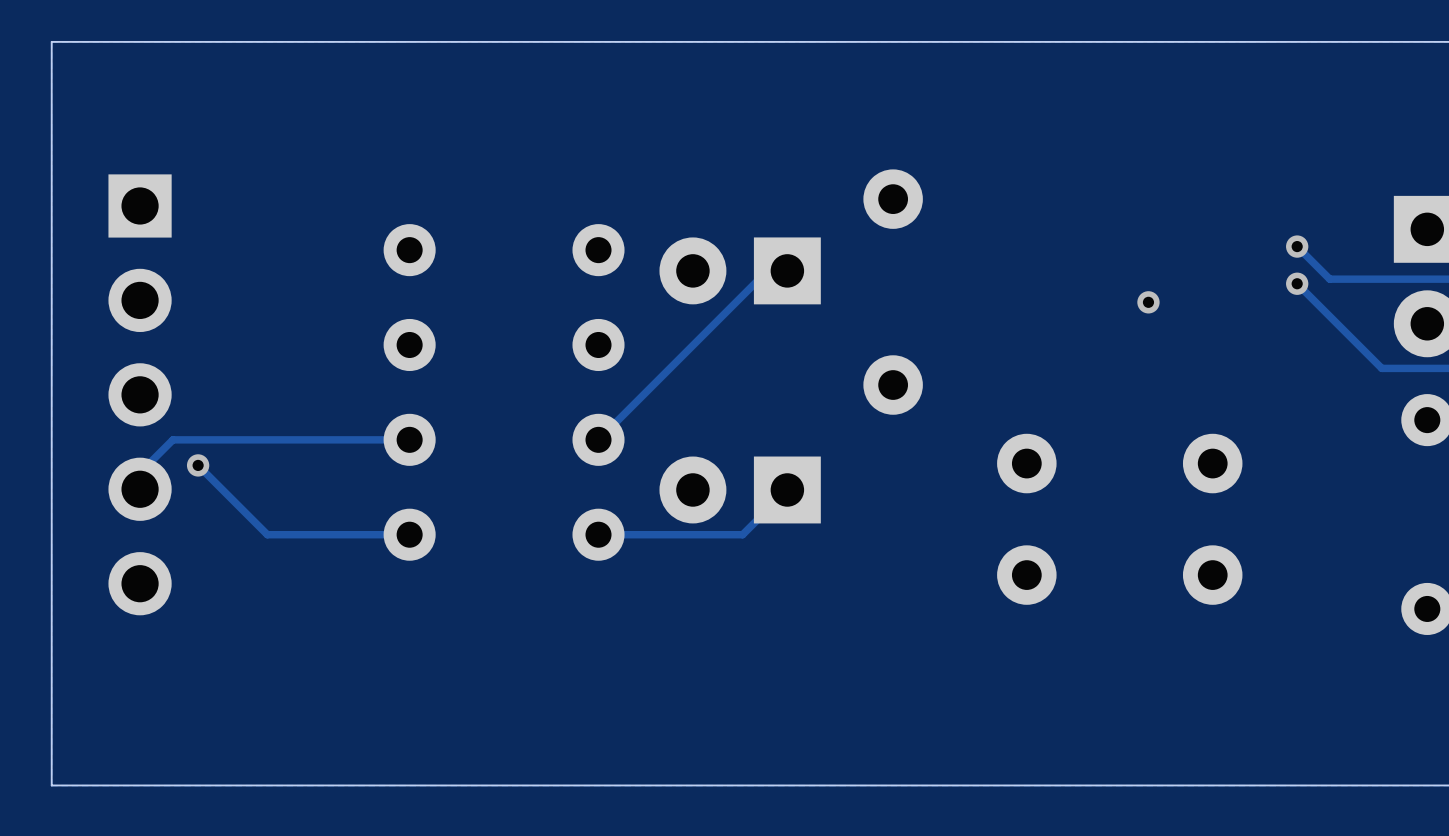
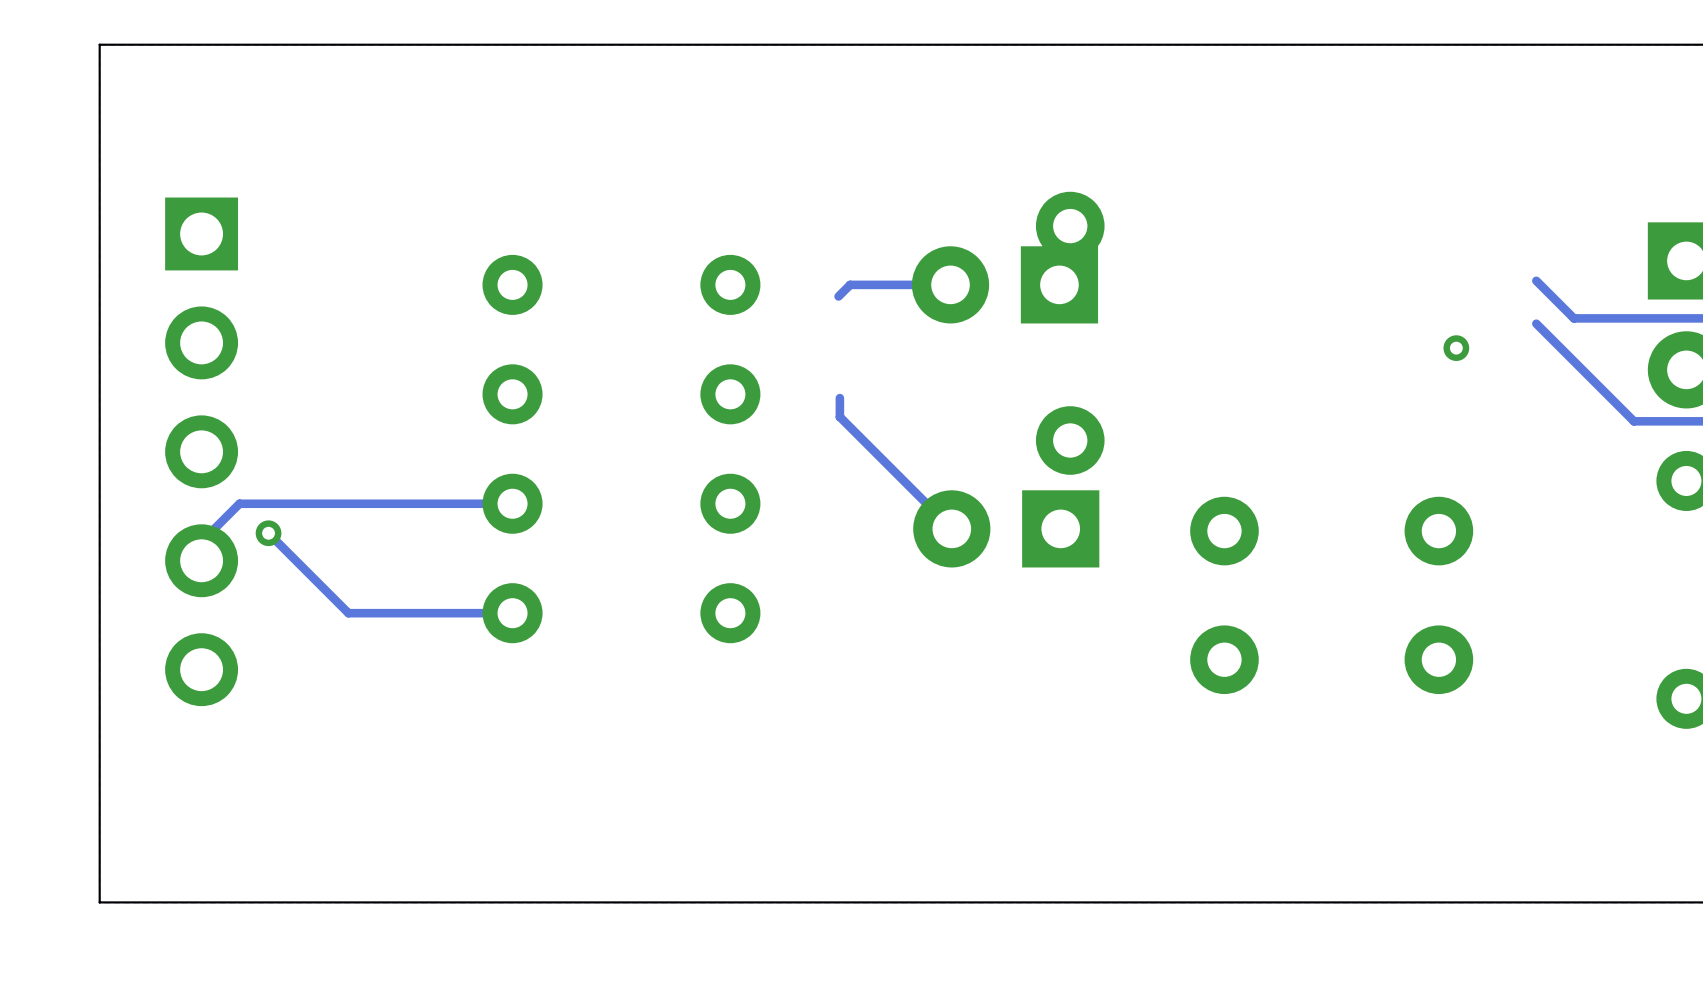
via: (1297, 246) -> none
track: none -> (950, 284) (850, 284) (838, 296)
part position: (740, 270) -> (1004, 284)
track: (787, 270) (767, 270) (598, 439) -> none
via: (1297, 283) -> none
via: (1148, 302) -> none
via: none -> (1456, 348)
track: none -> (839, 398) (839, 416) (951, 528)
part position: (740, 489) -> (1006, 528)
track: (787, 489) (742, 534) (598, 534) -> none

